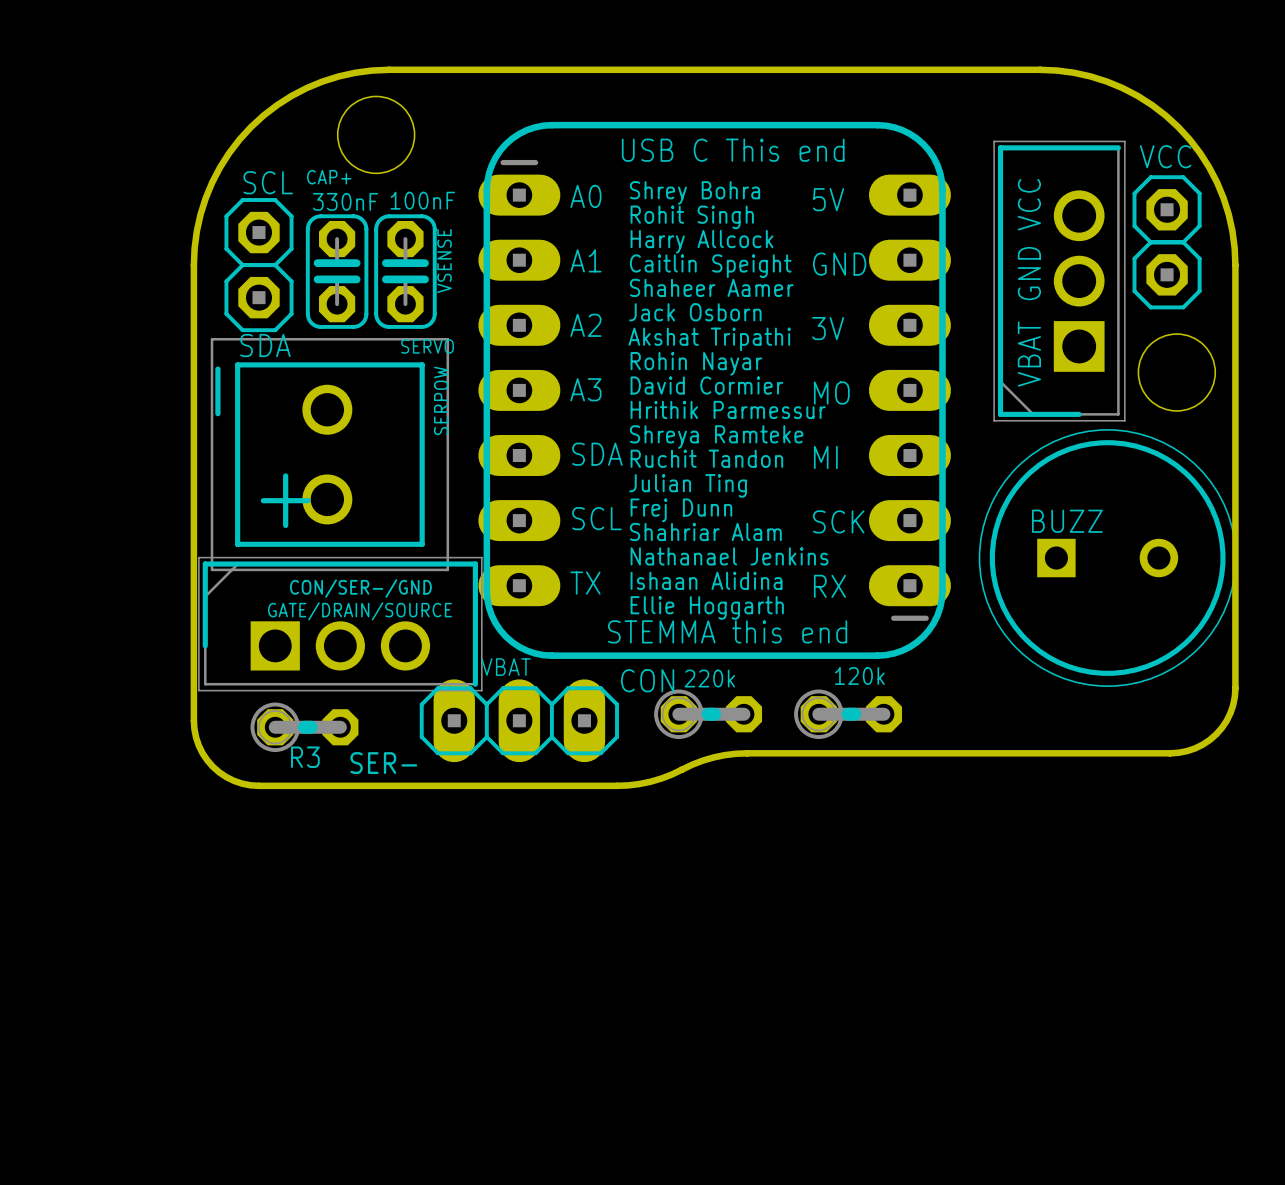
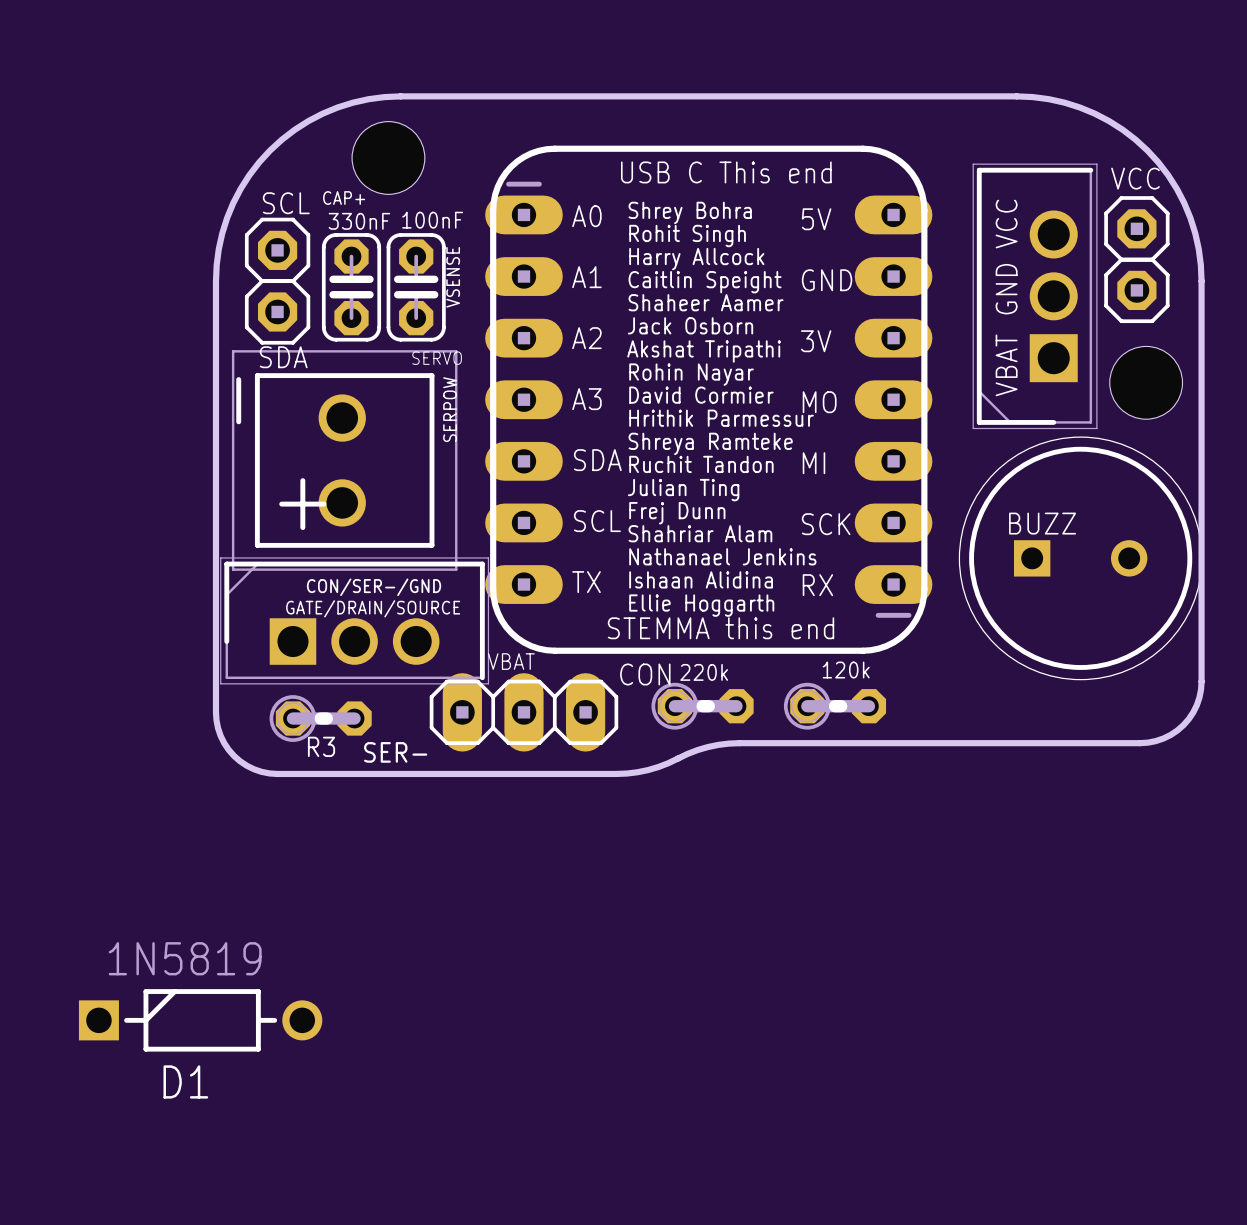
D1: none -> 1N5819 (200, 1020)

